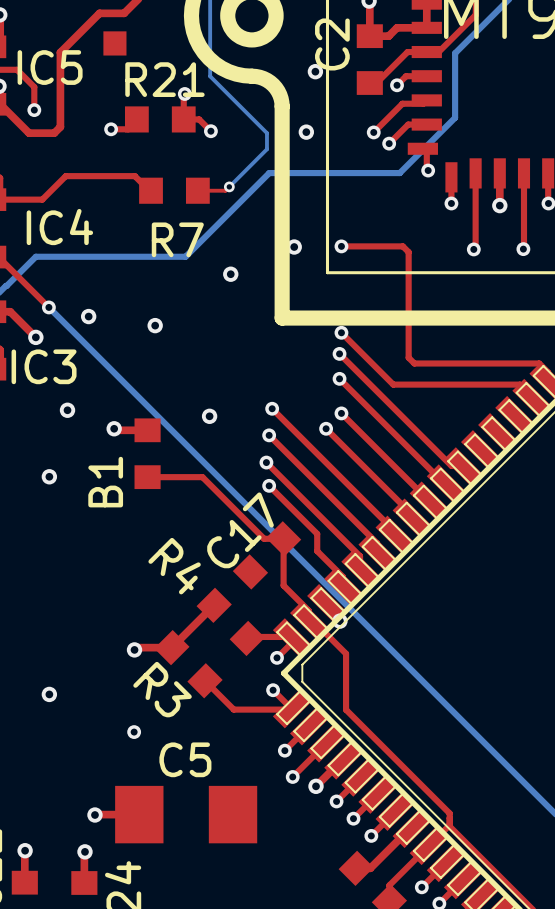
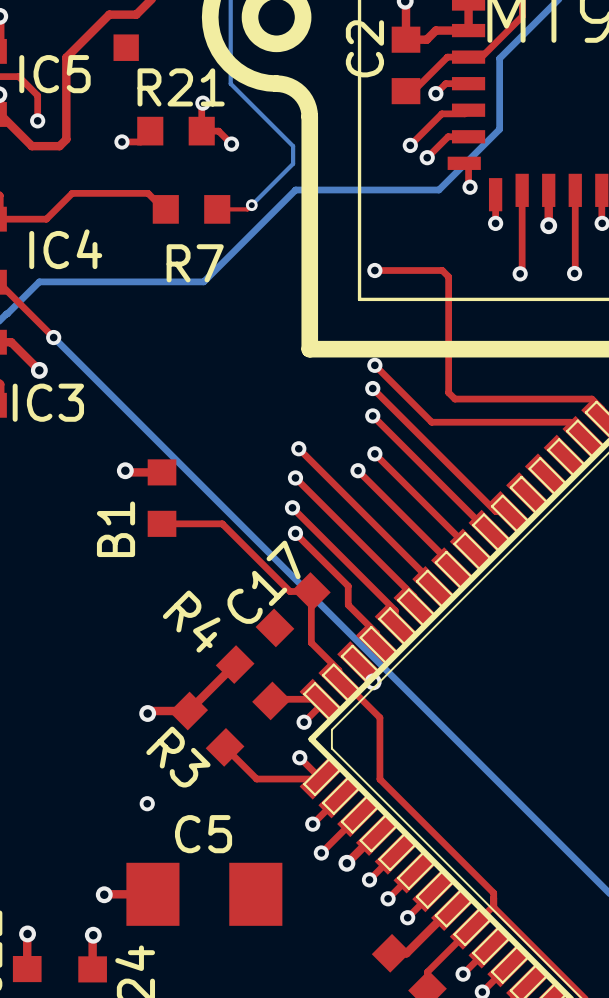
via: (315, 71) -> none
via: (306, 132) -> none
via: (294, 247) -> none
via: (230, 274) -> none
via: (88, 316) -> none
via: (155, 325) -> none
via: (67, 410) -> none
via: (209, 416) -> none
via: (49, 476) -> none
via: (49, 694) -> none

